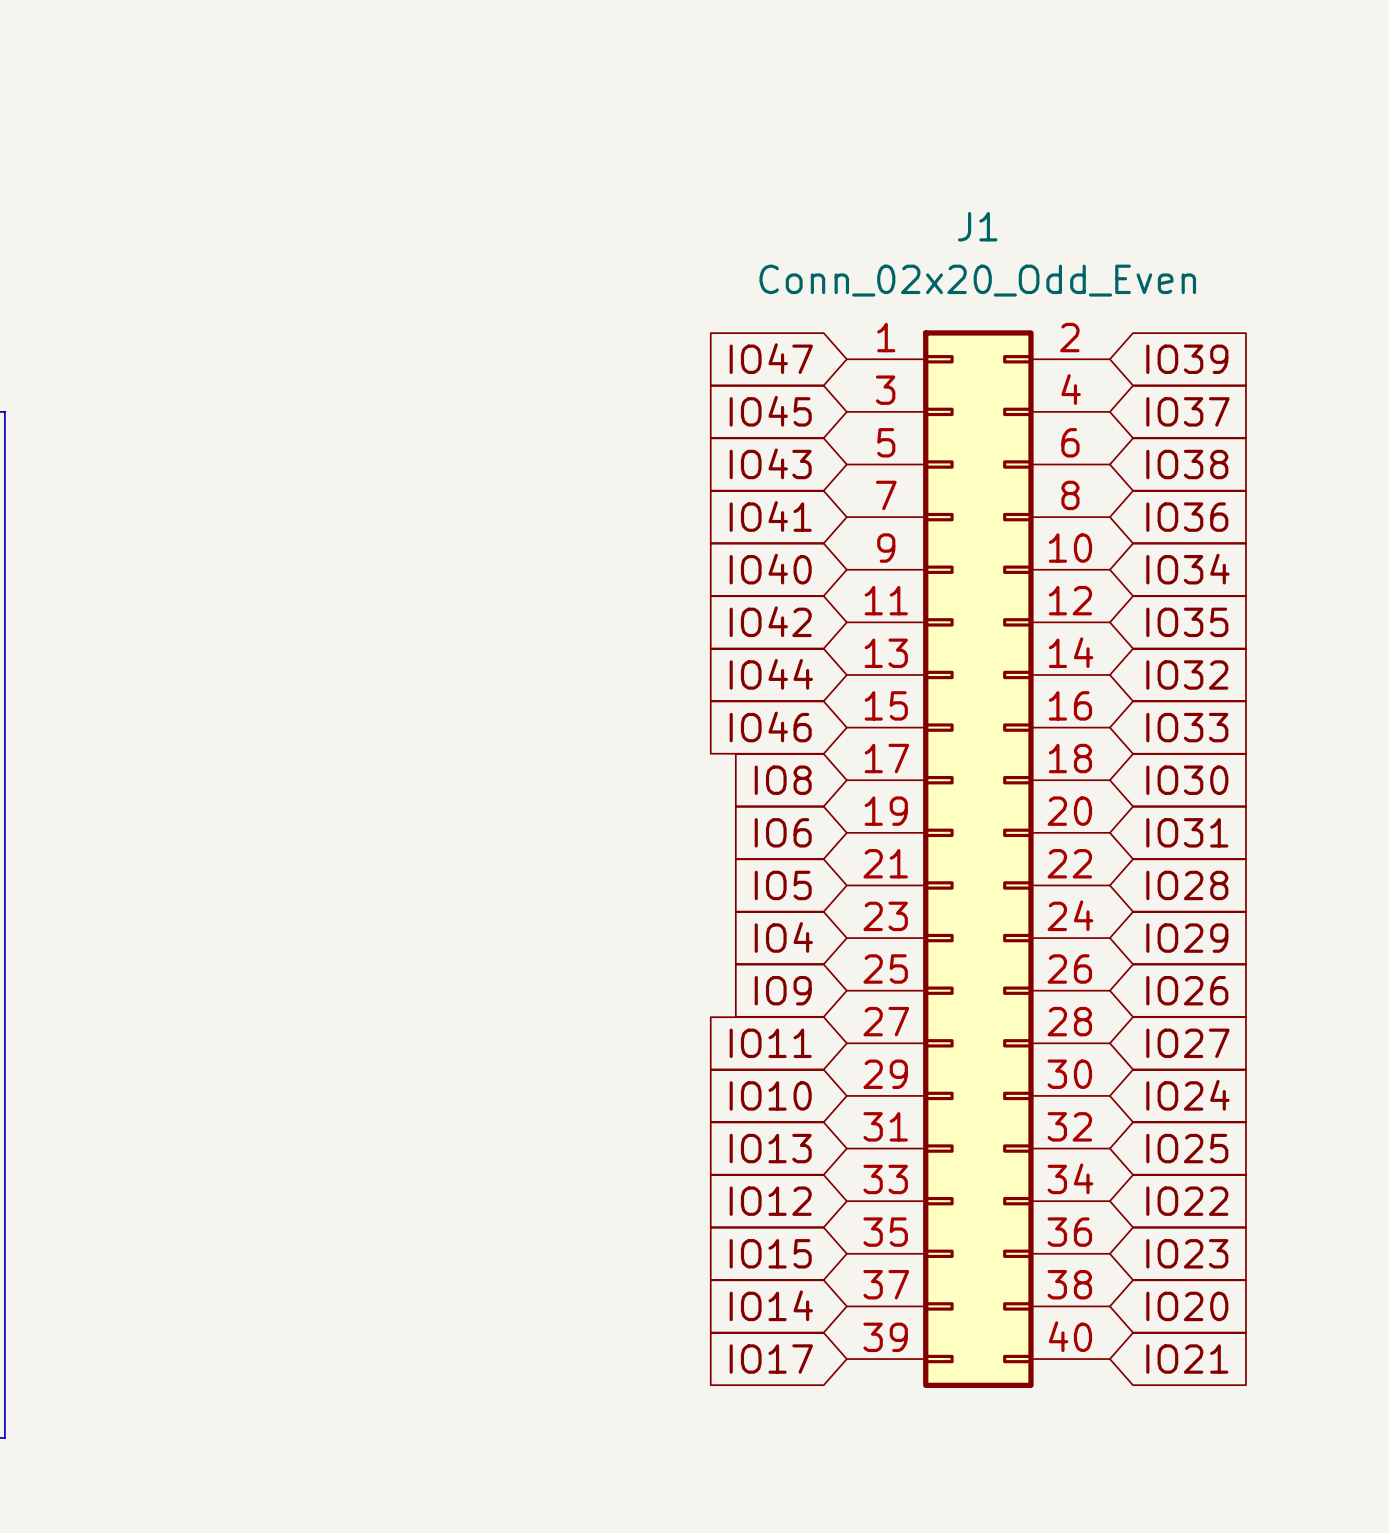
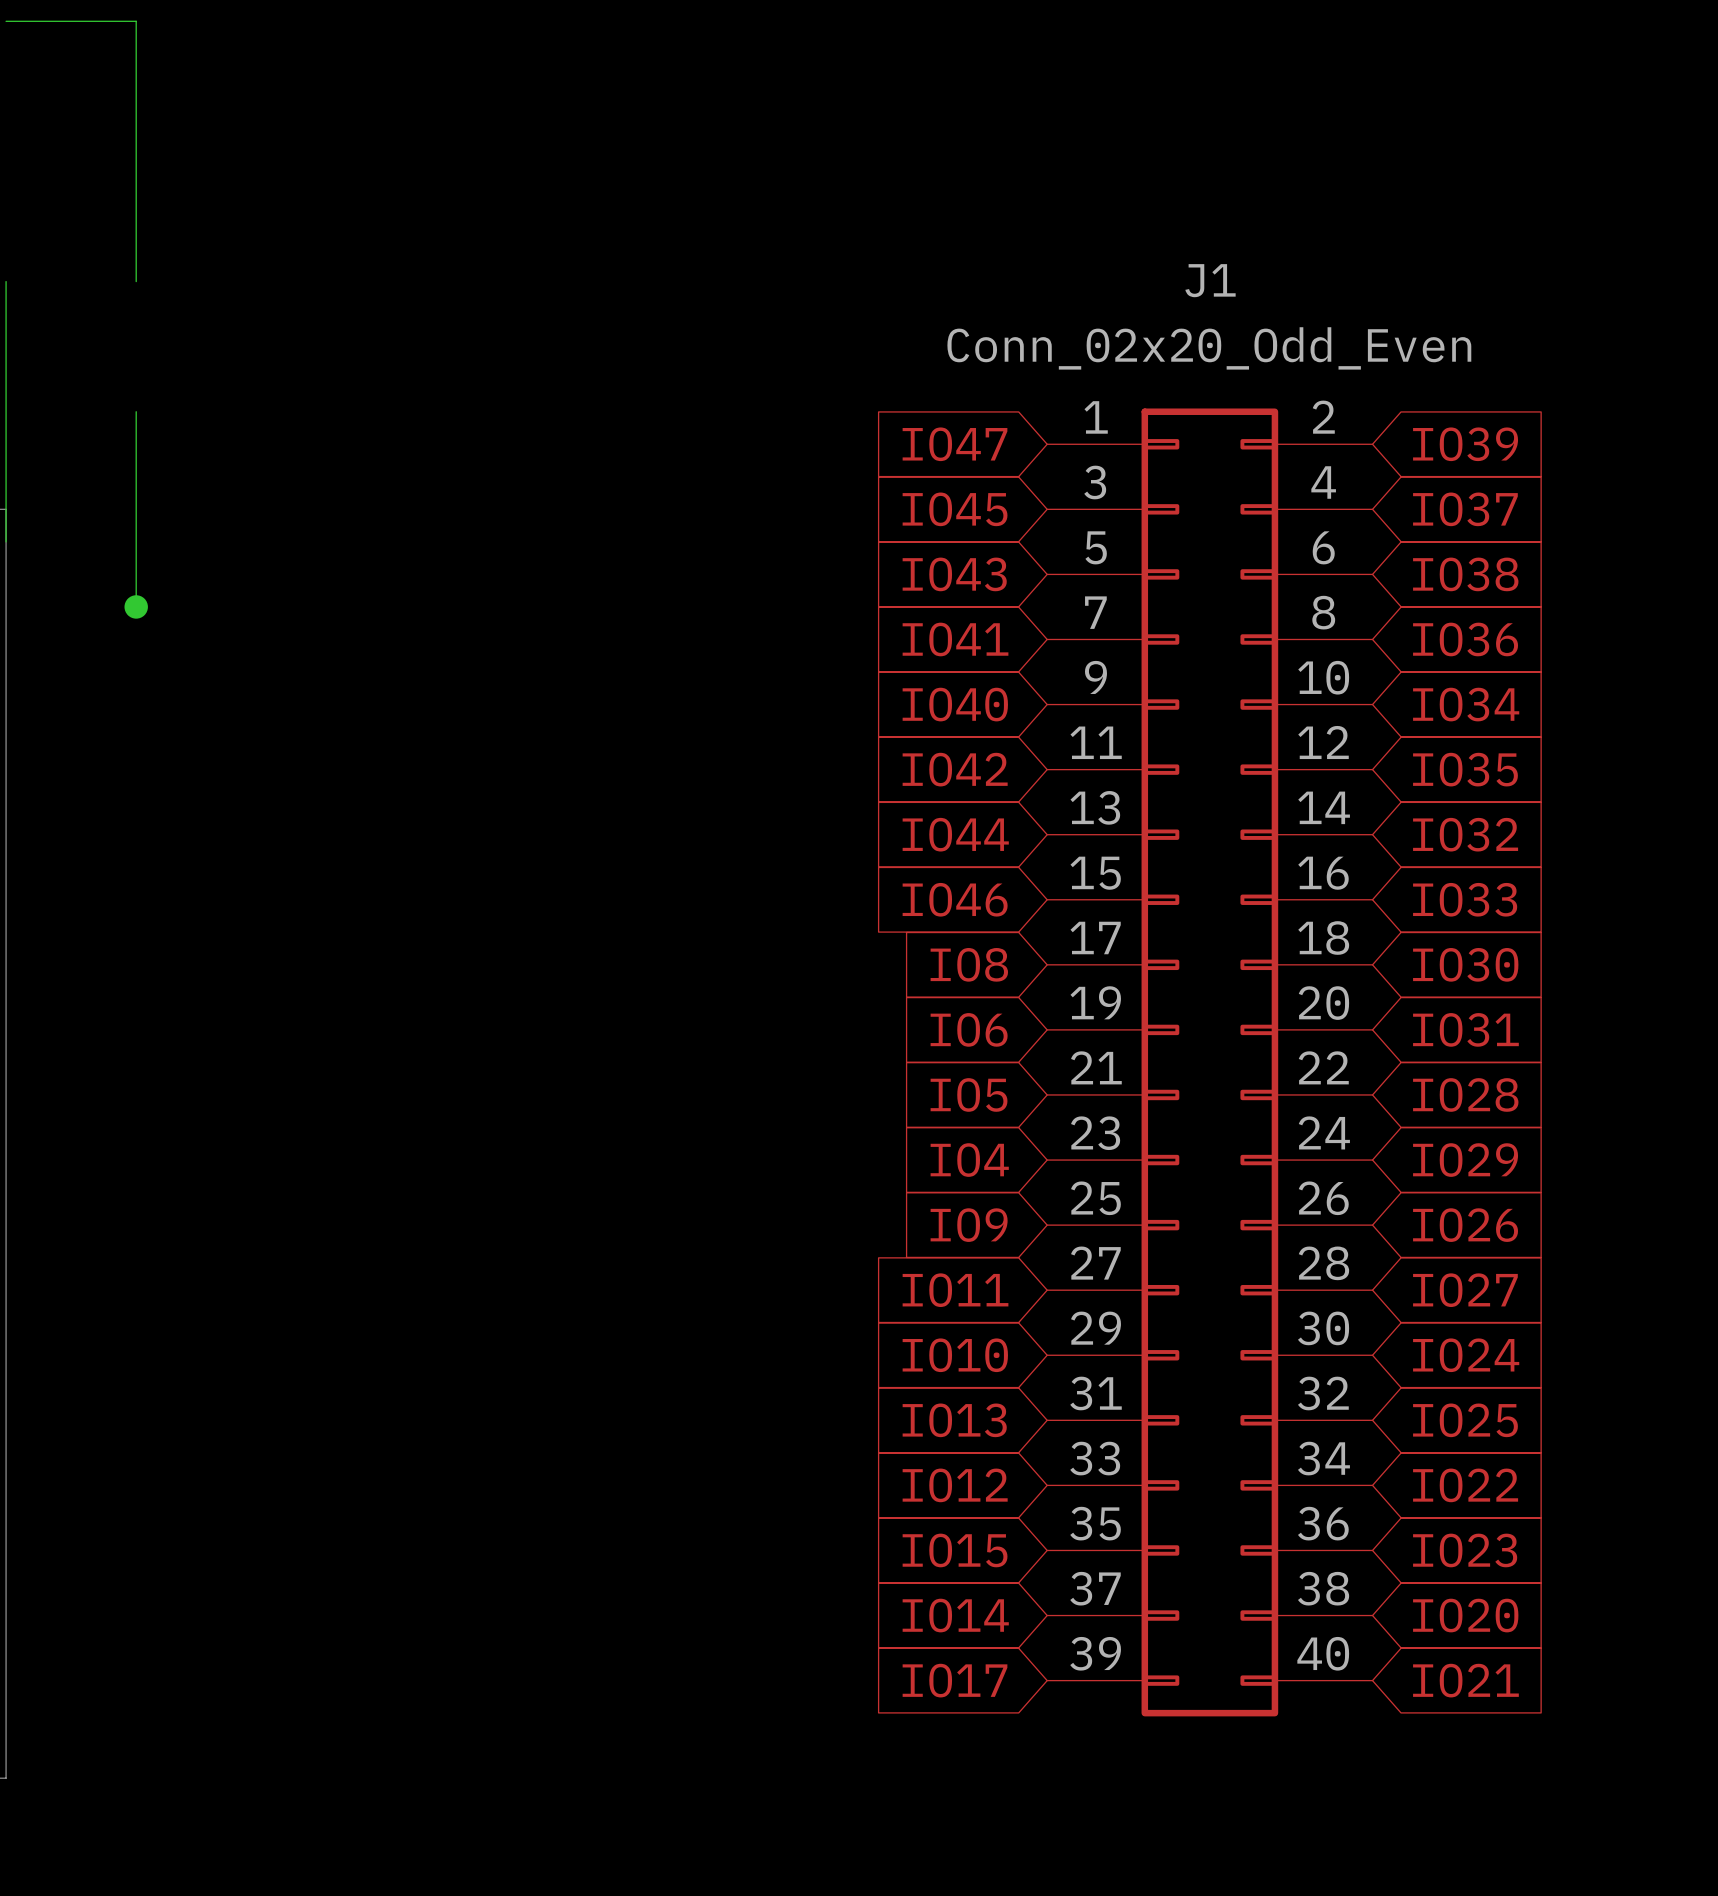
wire: none -> (6, 21) (136, 21) (136, 281)
wire: none -> (6, 281) (6, 541)
wire: none -> (136, 411) (136, 606)
junction: none -> (136, 606)

